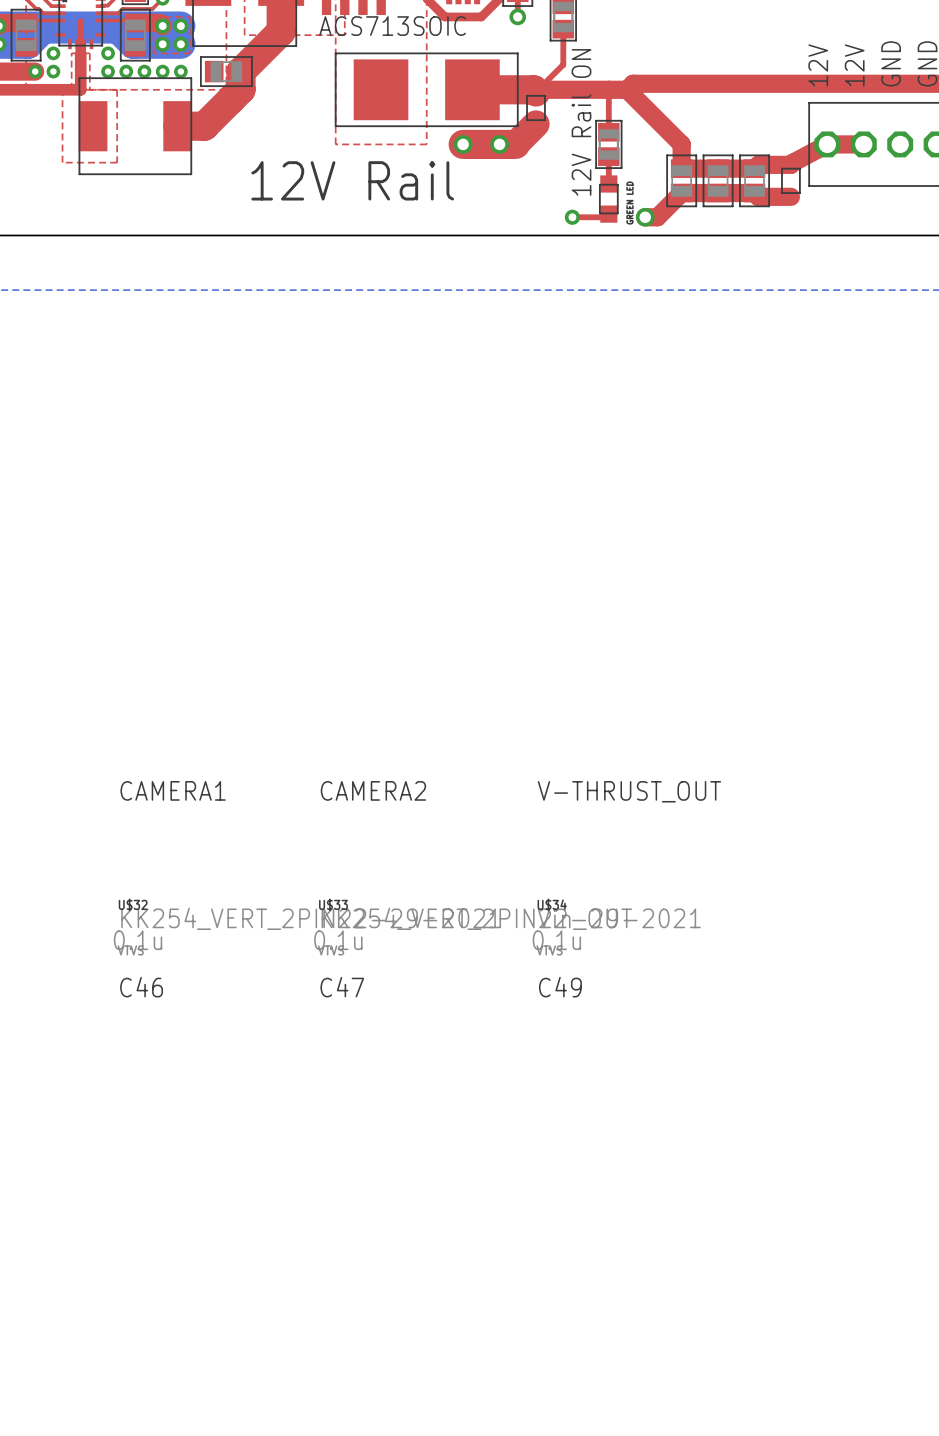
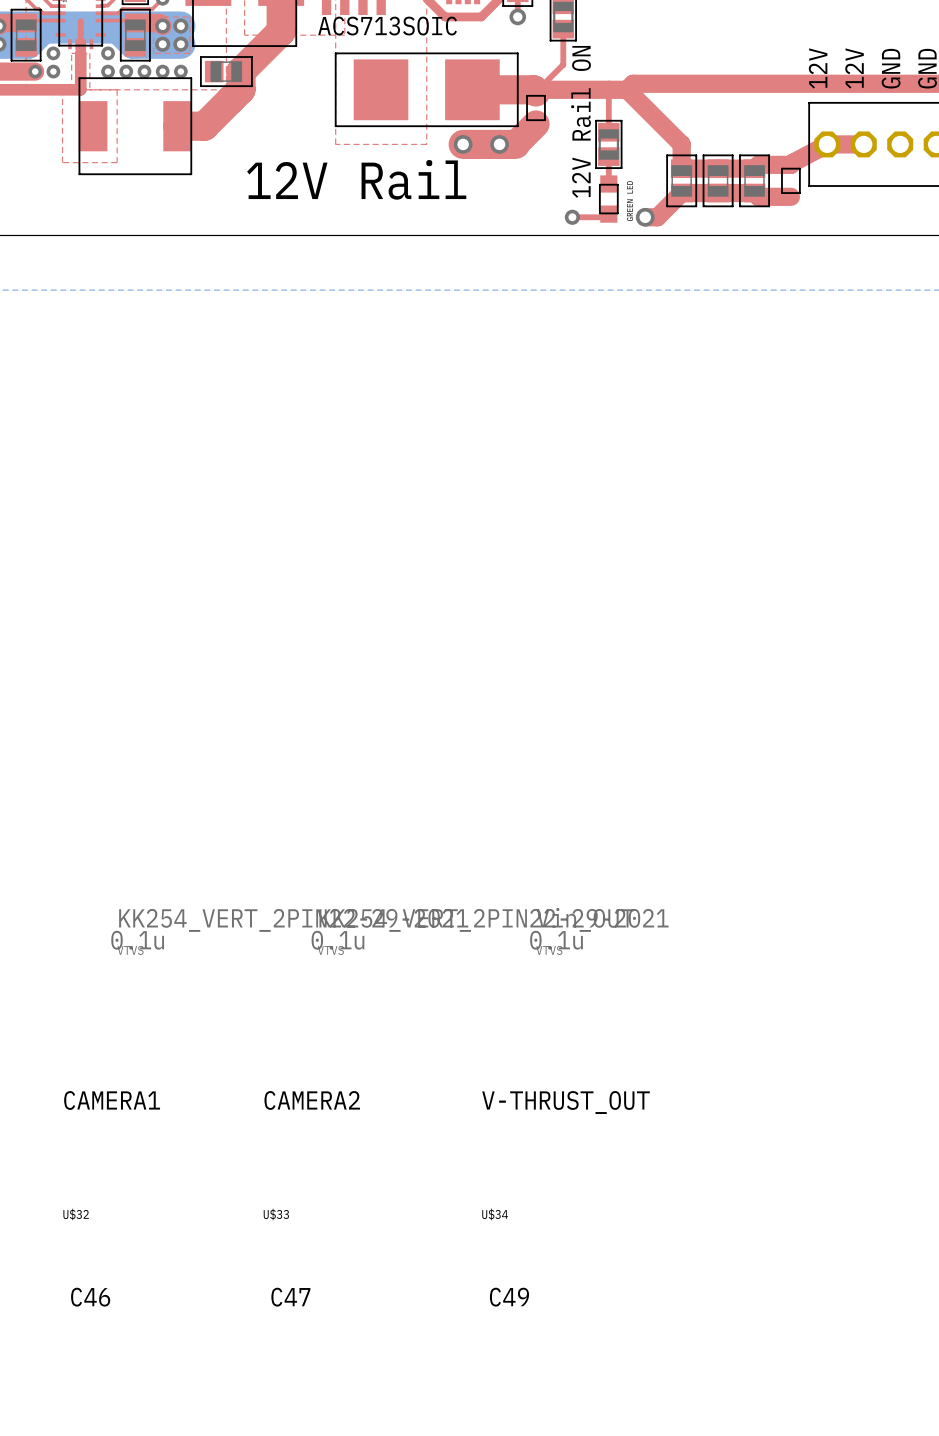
CAMERA1 name position: CAMERA1 (173, 790) -> CAMERA1 (112, 1100)
CAMERA2 name position: CAMERA2 (373, 790) -> CAMERA2 (312, 1100)
V-THRUST_OUT name position: V-THRUST_OUT (629, 791) -> V-THRUST_OUT (566, 1102)
U$32 name position: U$32 (133, 904) -> U$32 (76, 1214)
U$33 name position: U$33 (333, 904) -> U$33 (276, 1214)
U$34 name position: U$34 (552, 904) -> U$34 (495, 1214)
C46 name position: C46 (141, 987) -> C46 (90, 1297)
C47 name position: C47 (342, 987) -> C47 (290, 1297)
C49 name position: C49 (560, 987) -> C49 (509, 1297)

